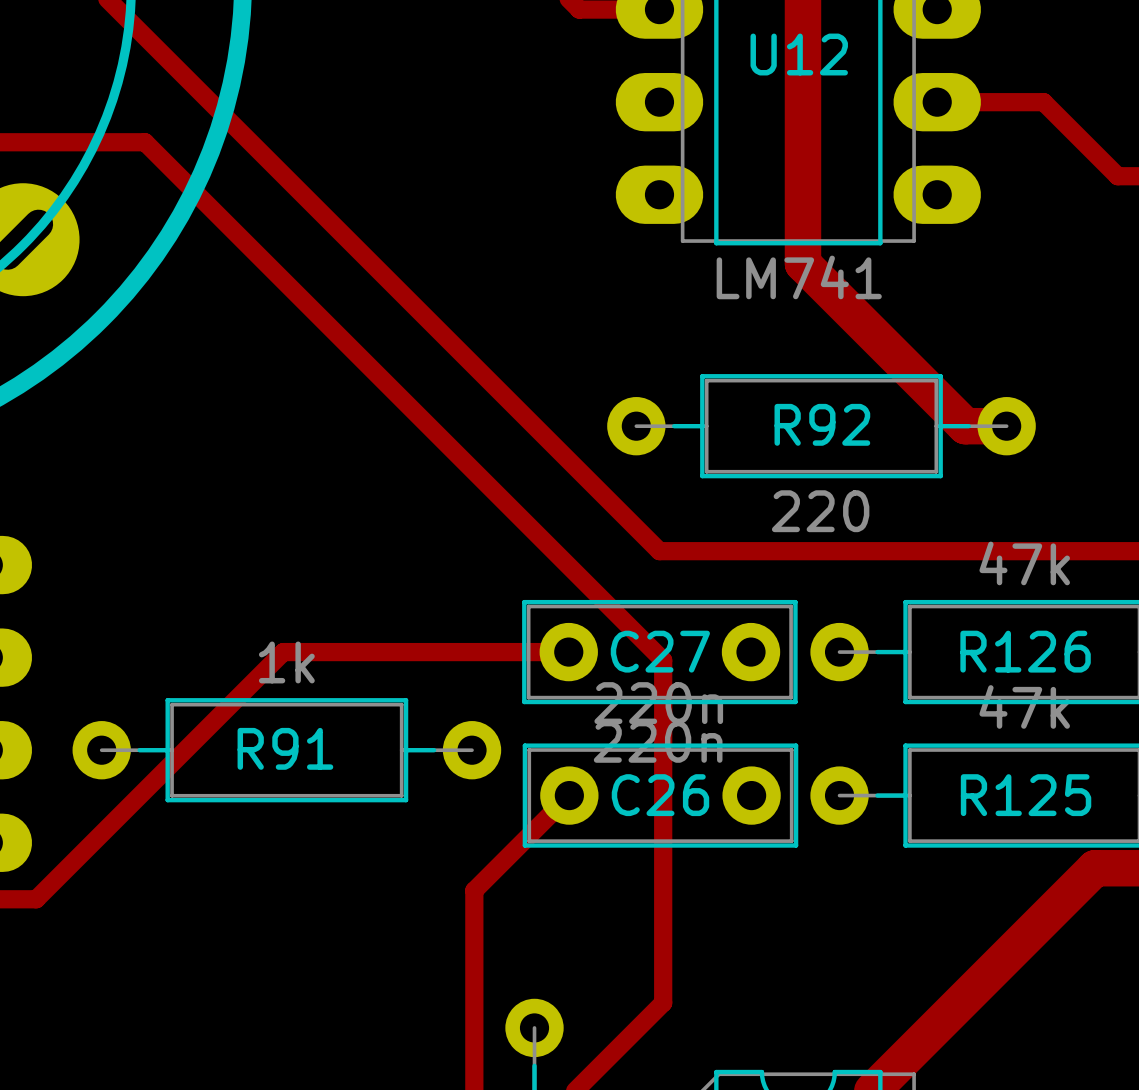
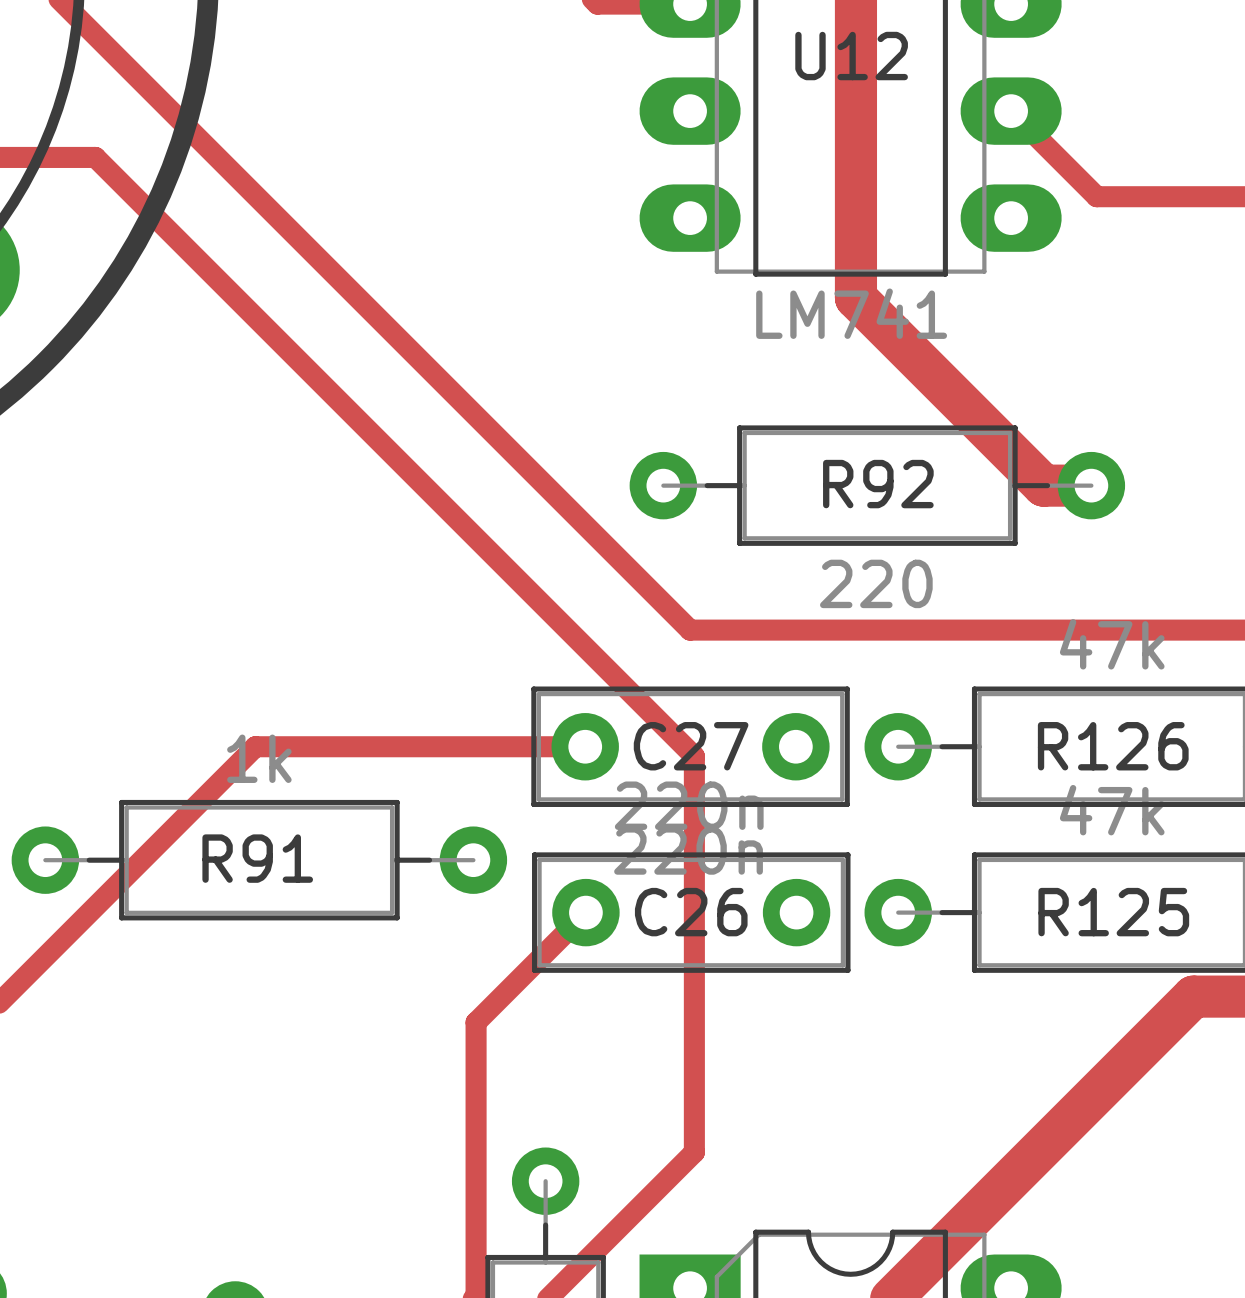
track: (937, 102) (1043, 102) (1117, 176) -> (1011, 111) (1096, 196) (1219, 196)

